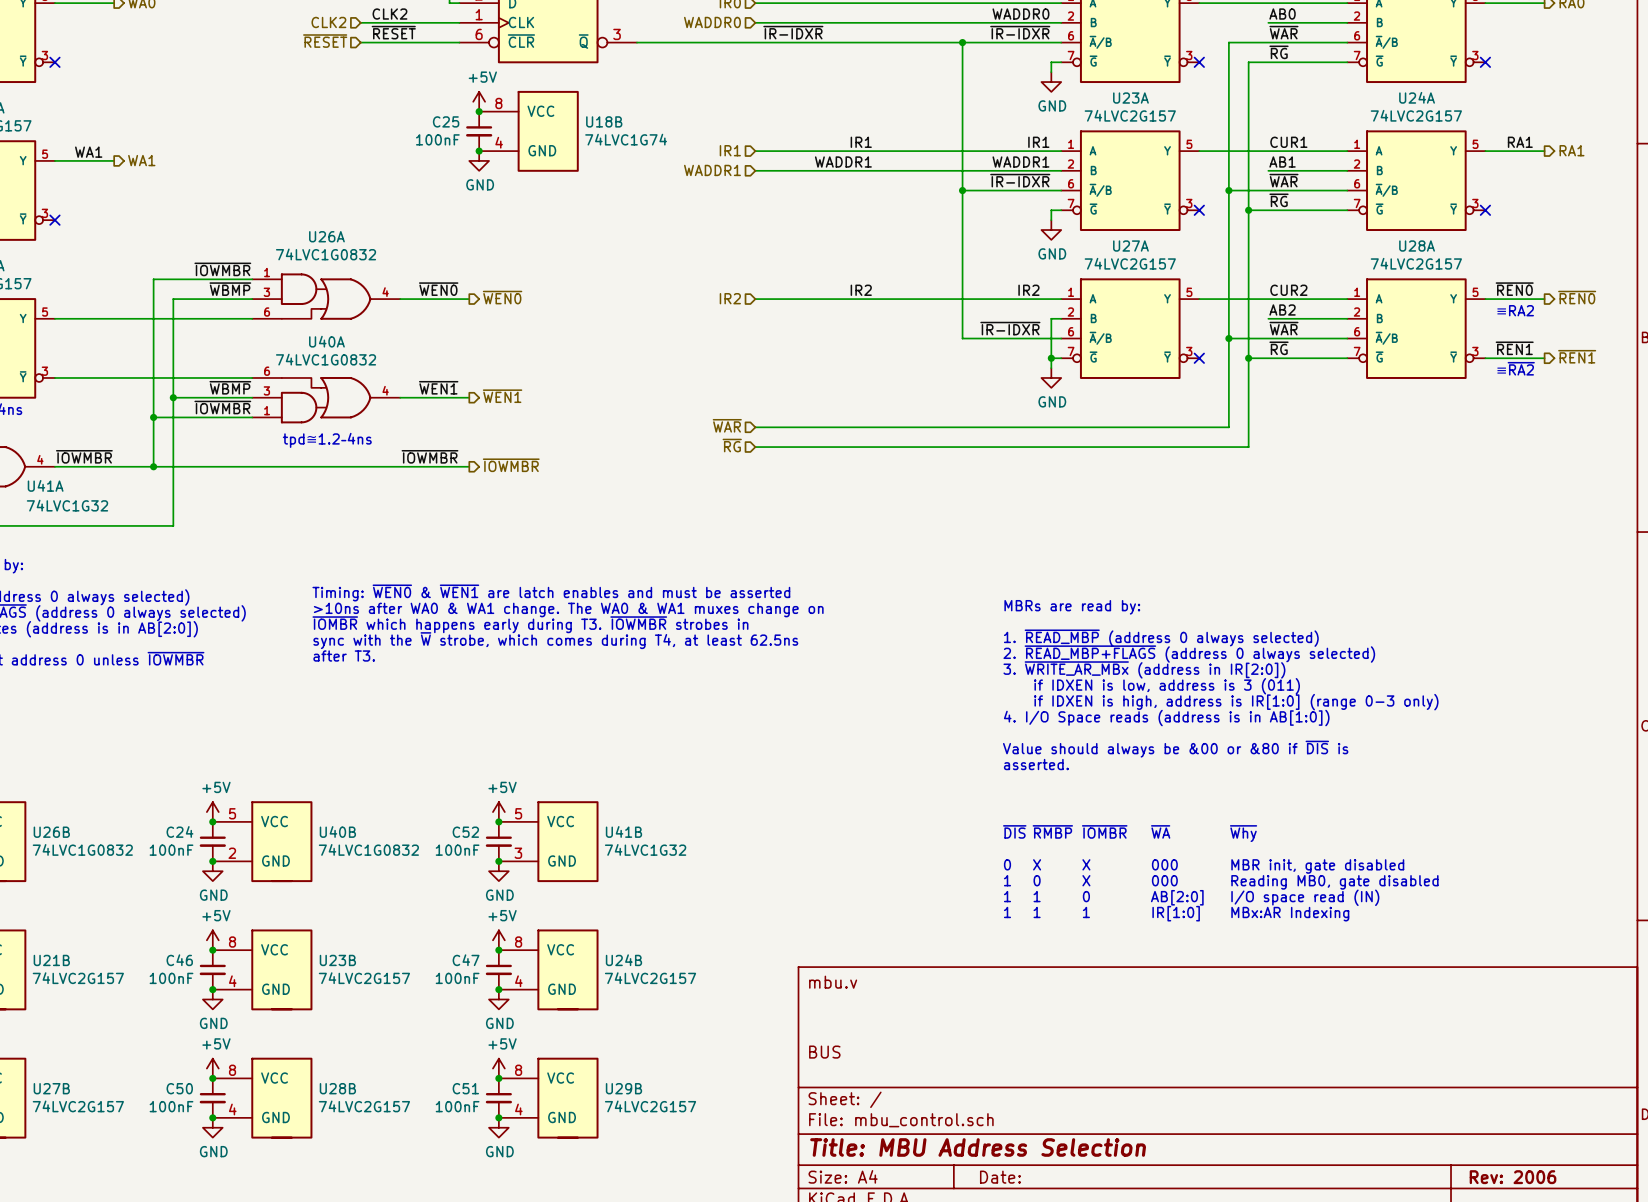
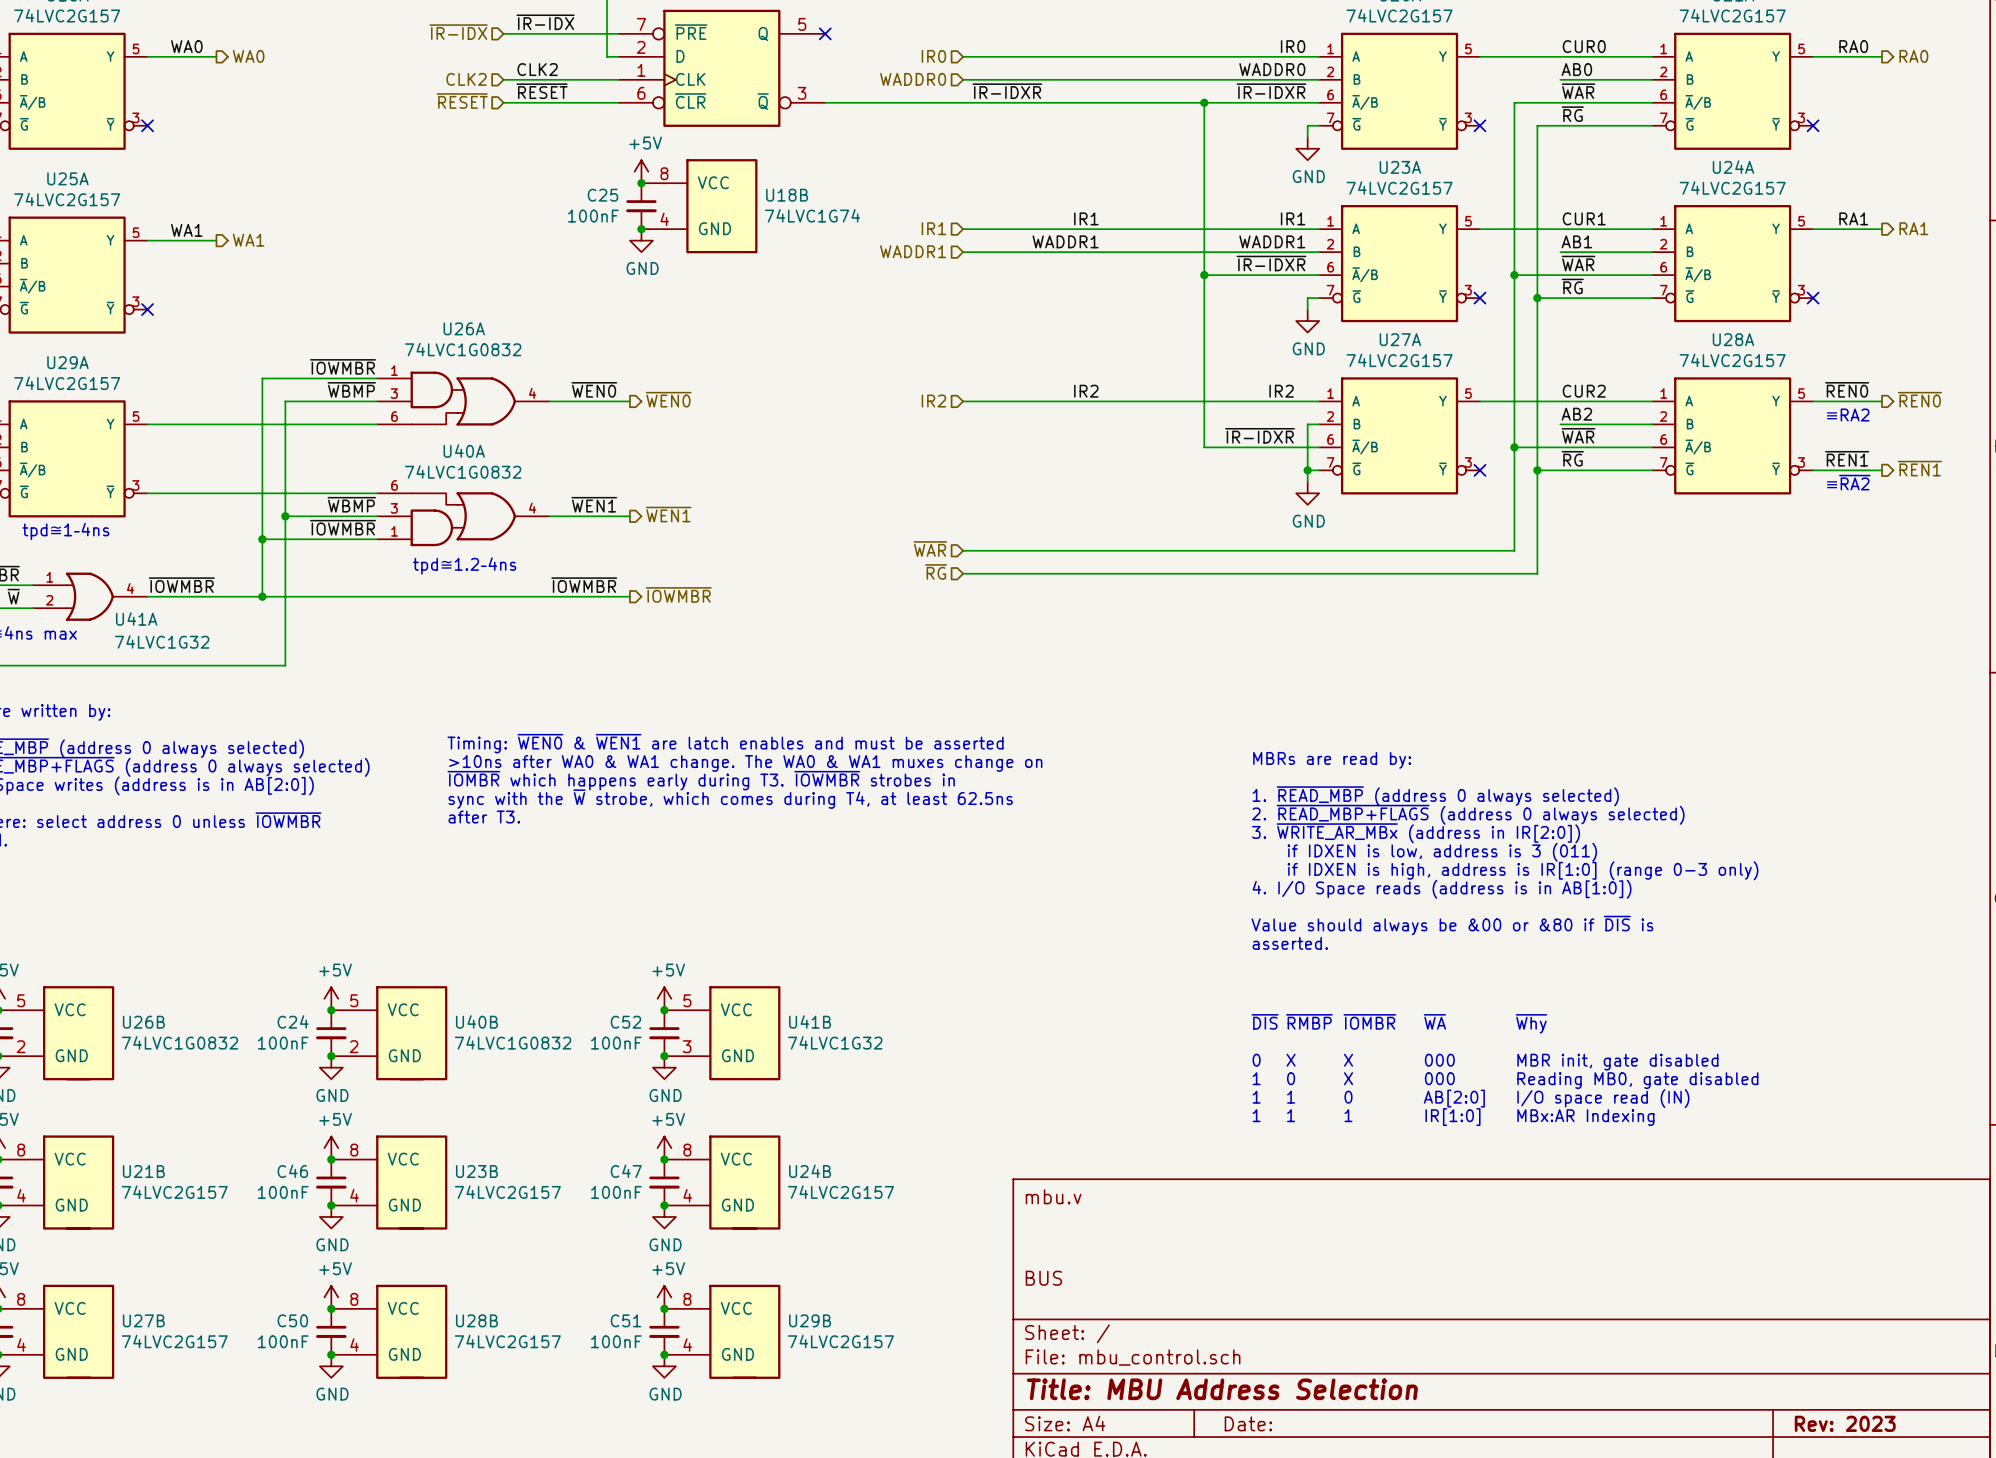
title block: Rev: 2006 (1513, 1177) -> Rev: 2023 (1845, 1423)

